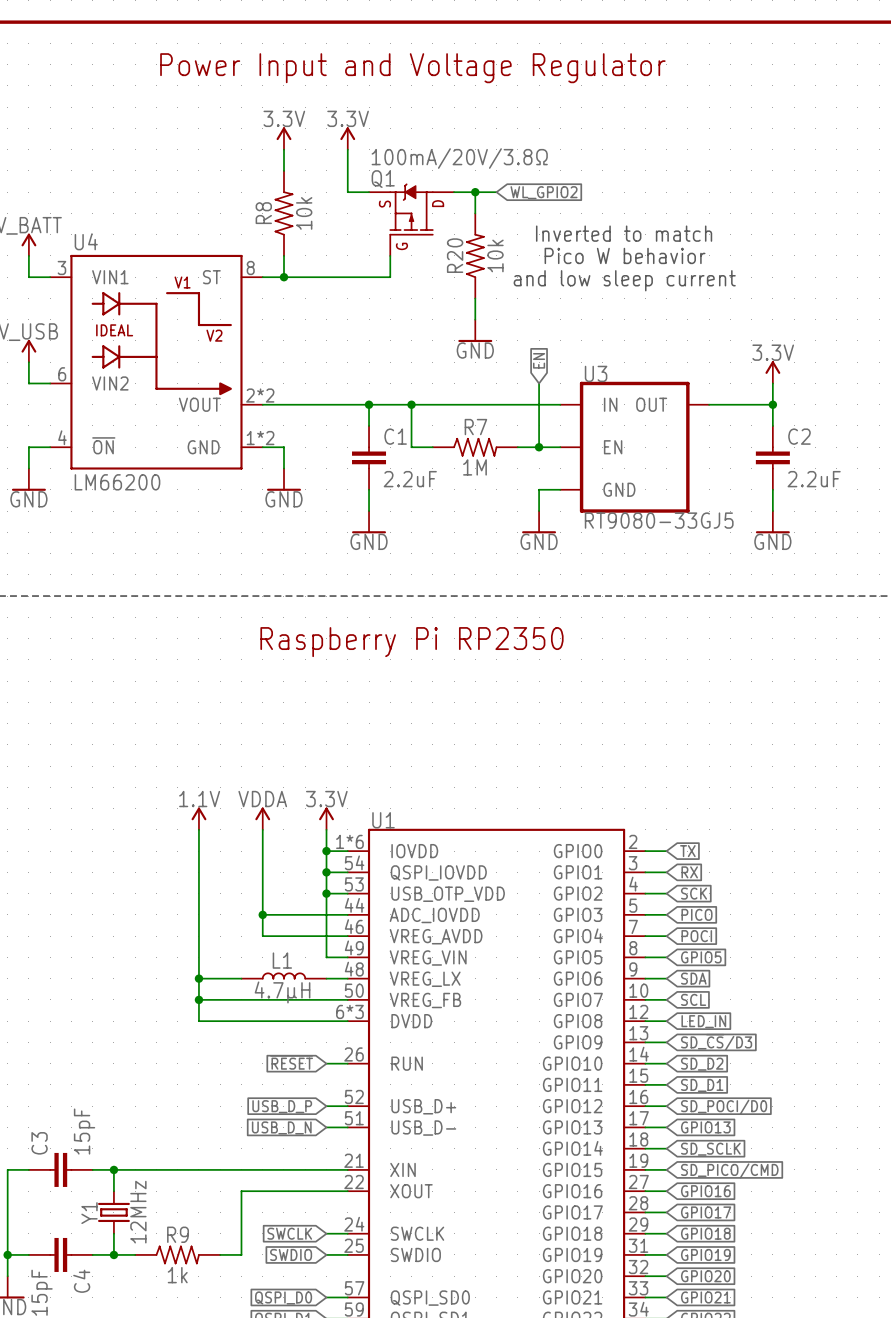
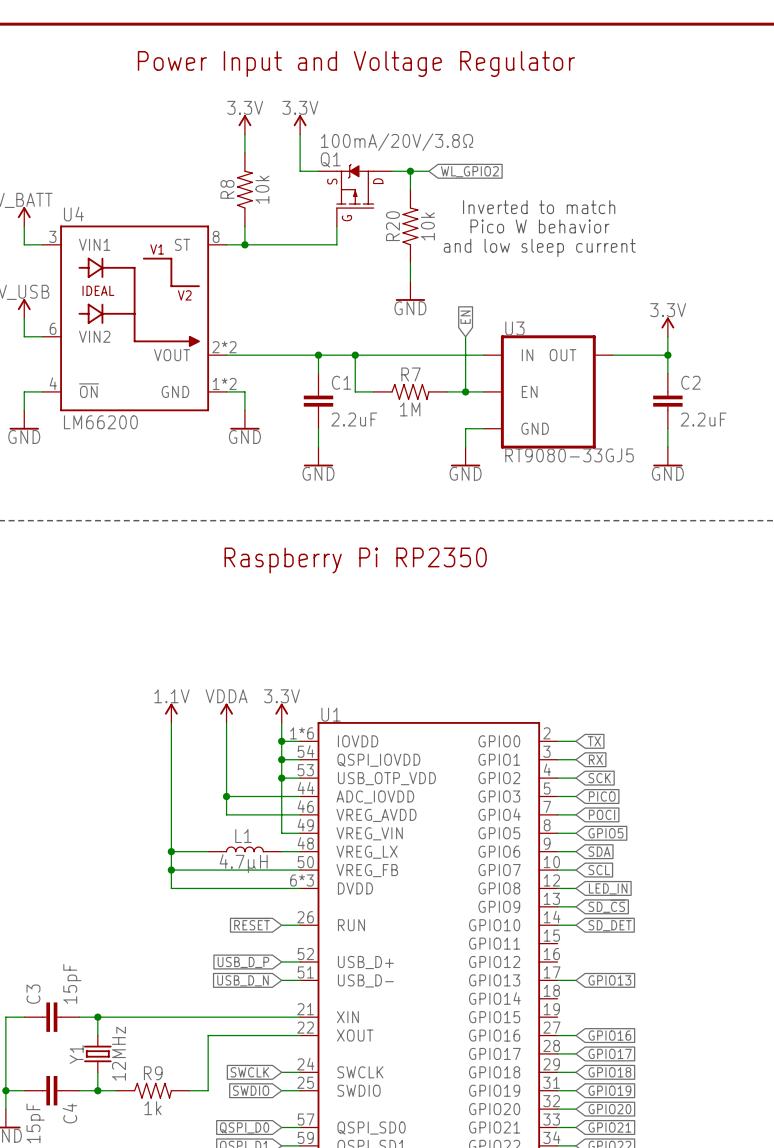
global label: SD_~{CS}/D3 (716, 1042) -> SD_~{CS} (607, 906)
global label: SD_D2 (702, 1064) -> ~{SD_DET} (609, 924)
wire: (645, 1084) (666, 1084) -> none
global label: SD_D1 (702, 1085) -> none
wire: (645, 1106) (666, 1106) -> none
global label: SD_POCI/D0 (724, 1107) -> none
wire: (645, 1148) (666, 1148) -> none
global label: SD_SCLK (710, 1149) -> none
wire: (645, 1169) (666, 1169) -> none
global label: SD_PICO/CMD (729, 1170) -> none

